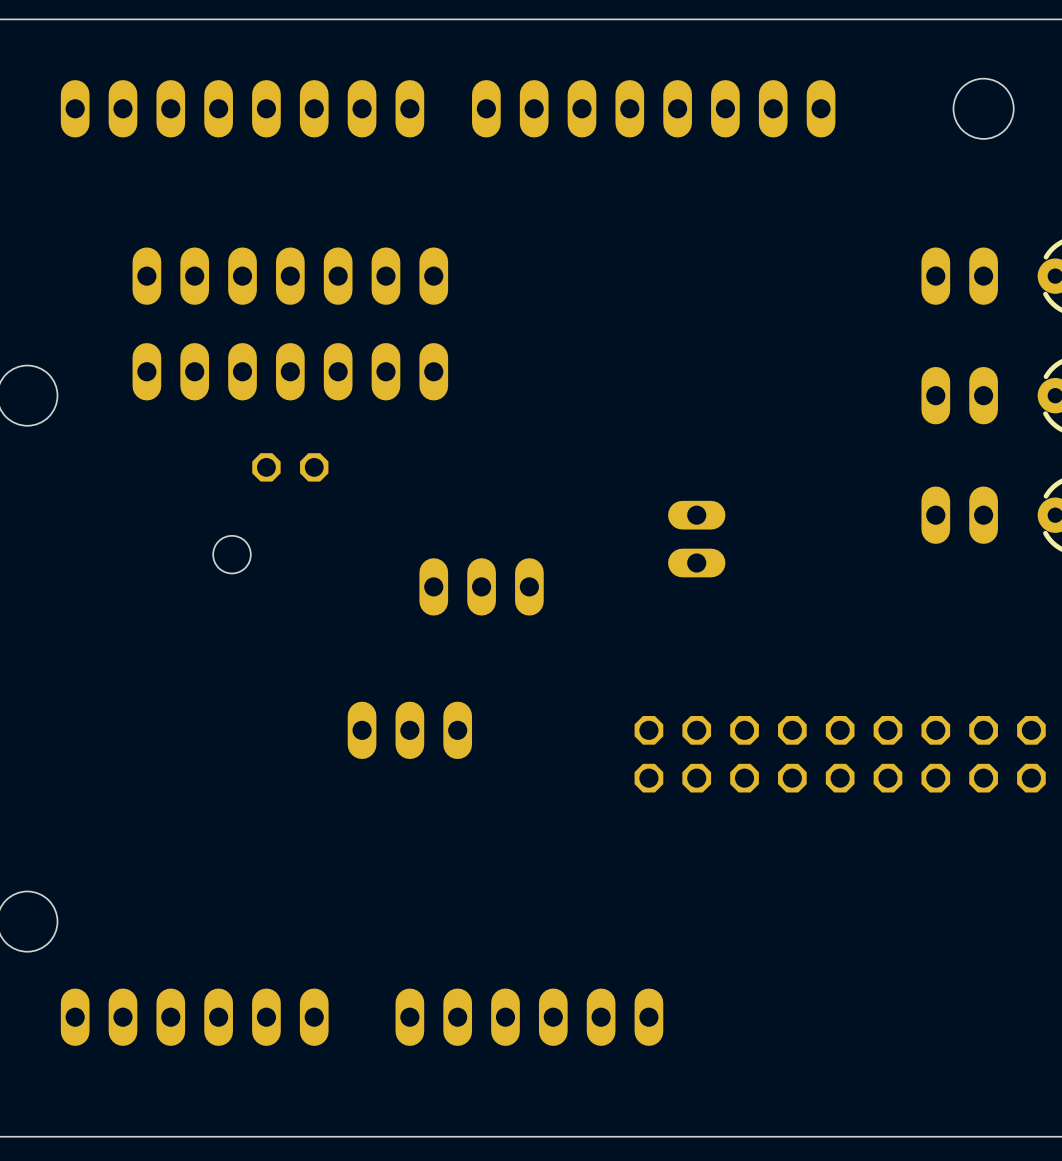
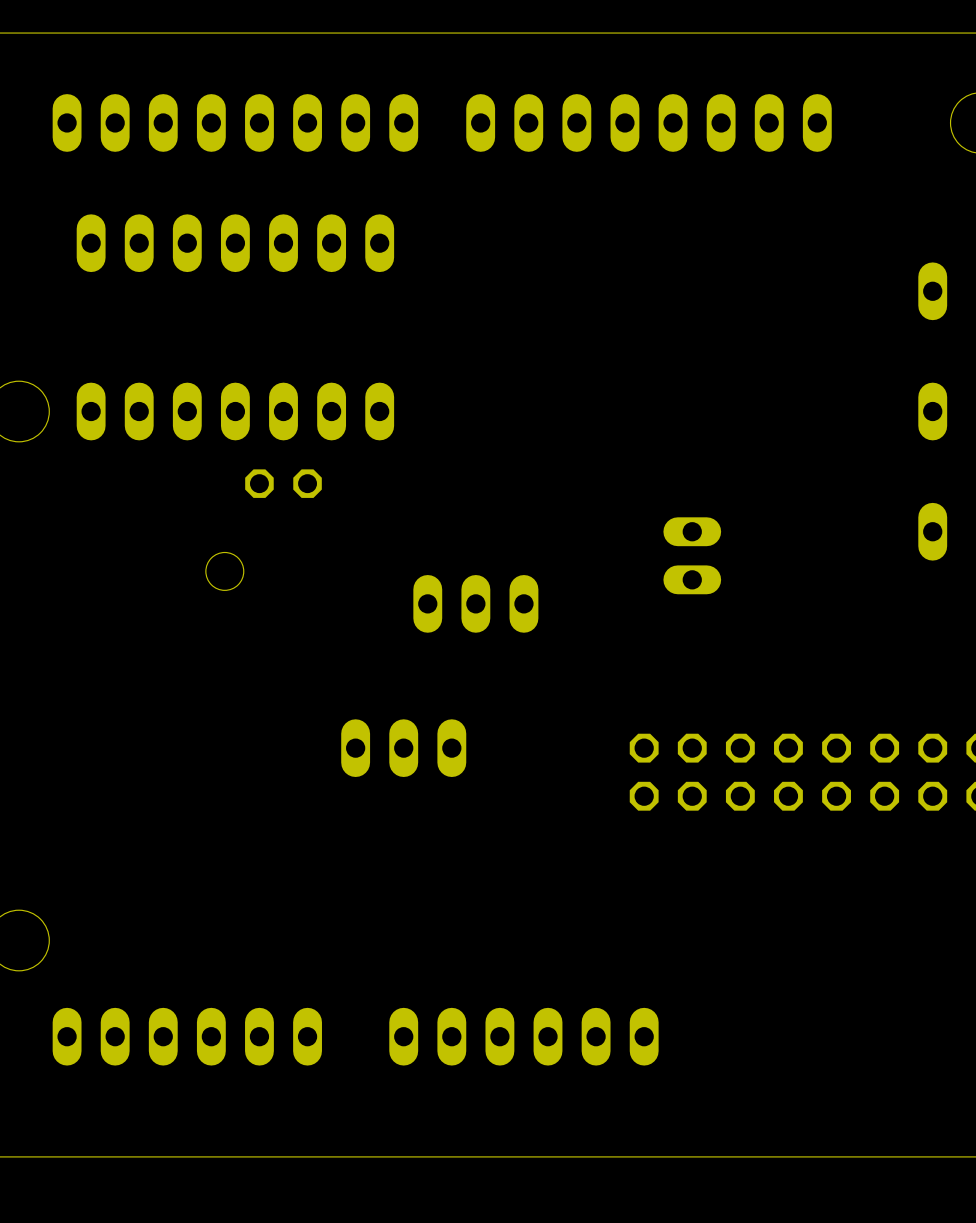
part: none -> (235, 243)
part: (290, 276) -> none
part position: (290, 371) -> (235, 411)

